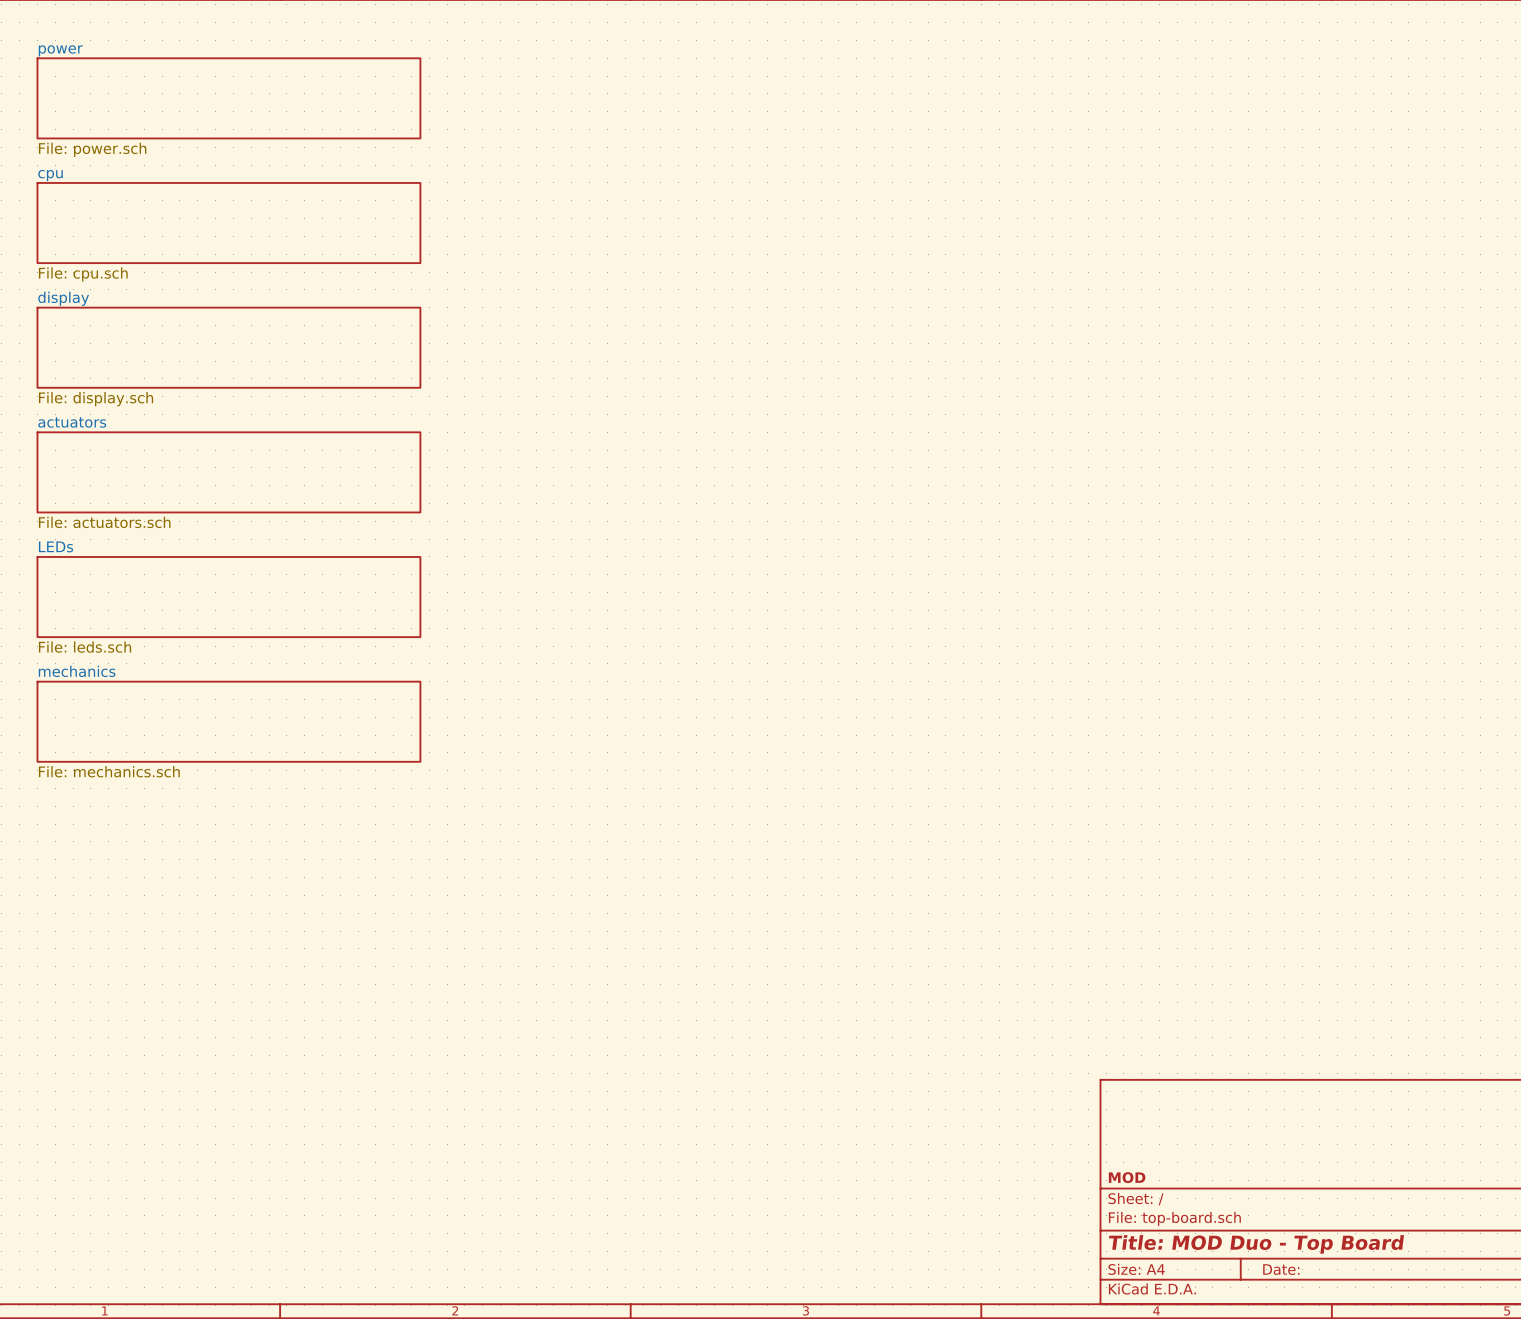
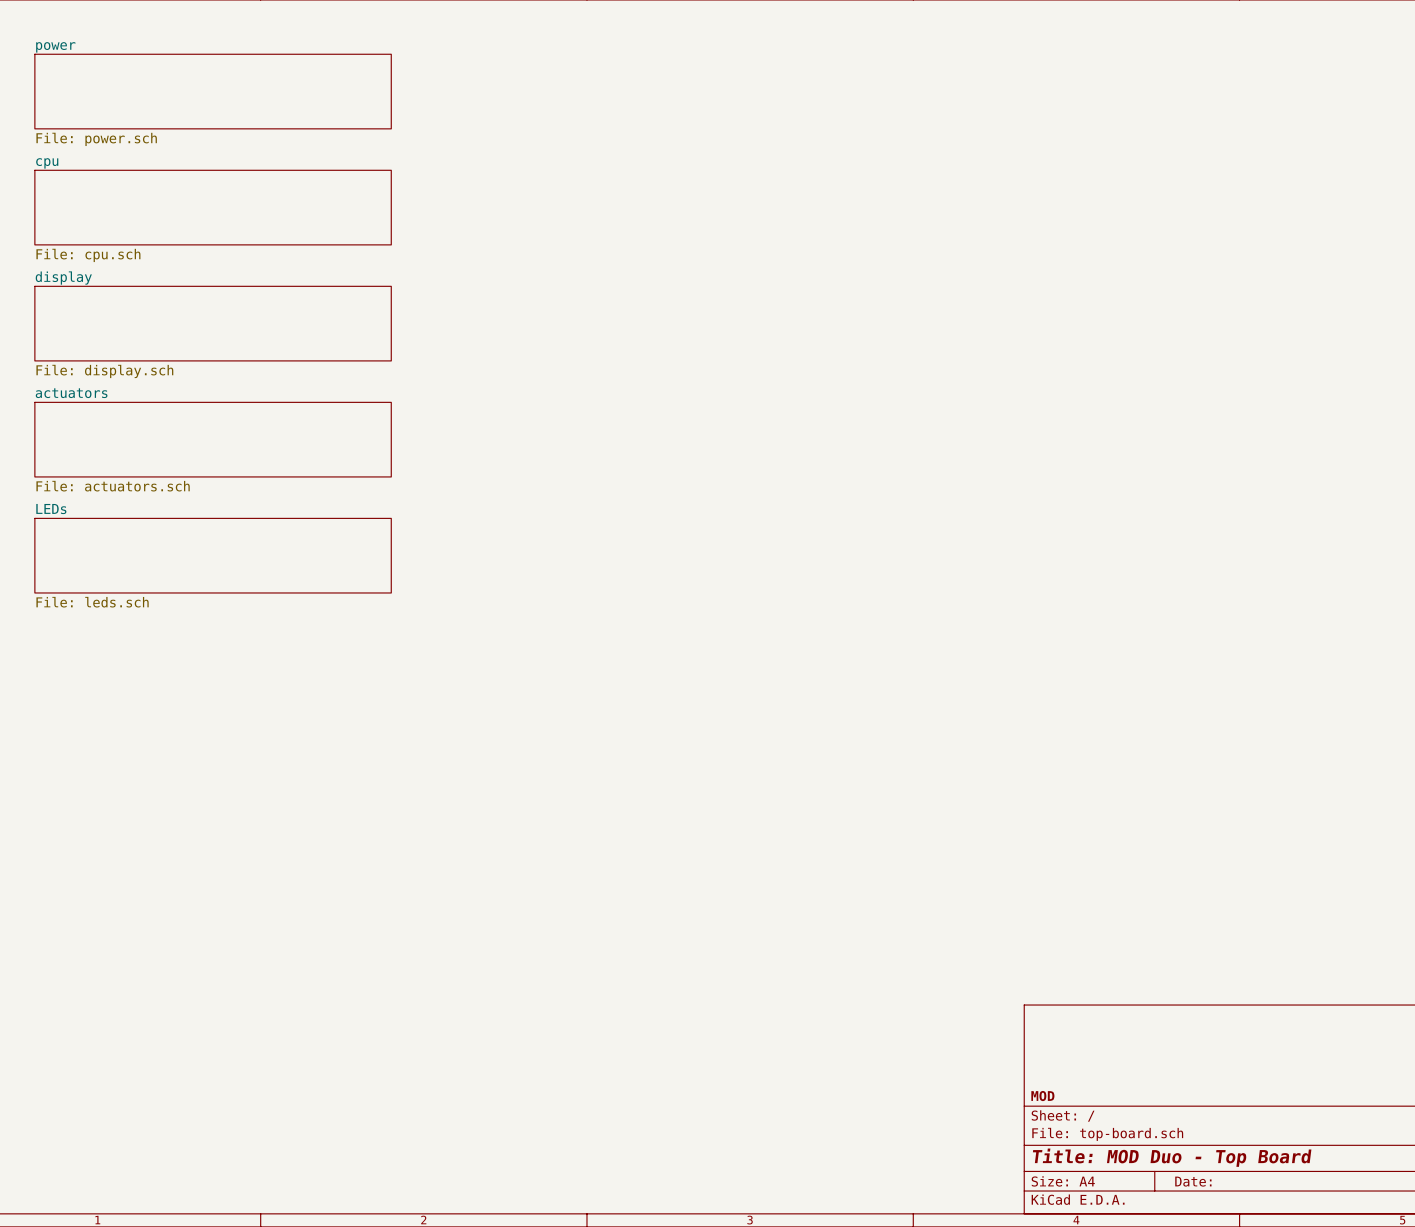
sheet mechanics: File: mechanics.sch (228, 721) -> none

